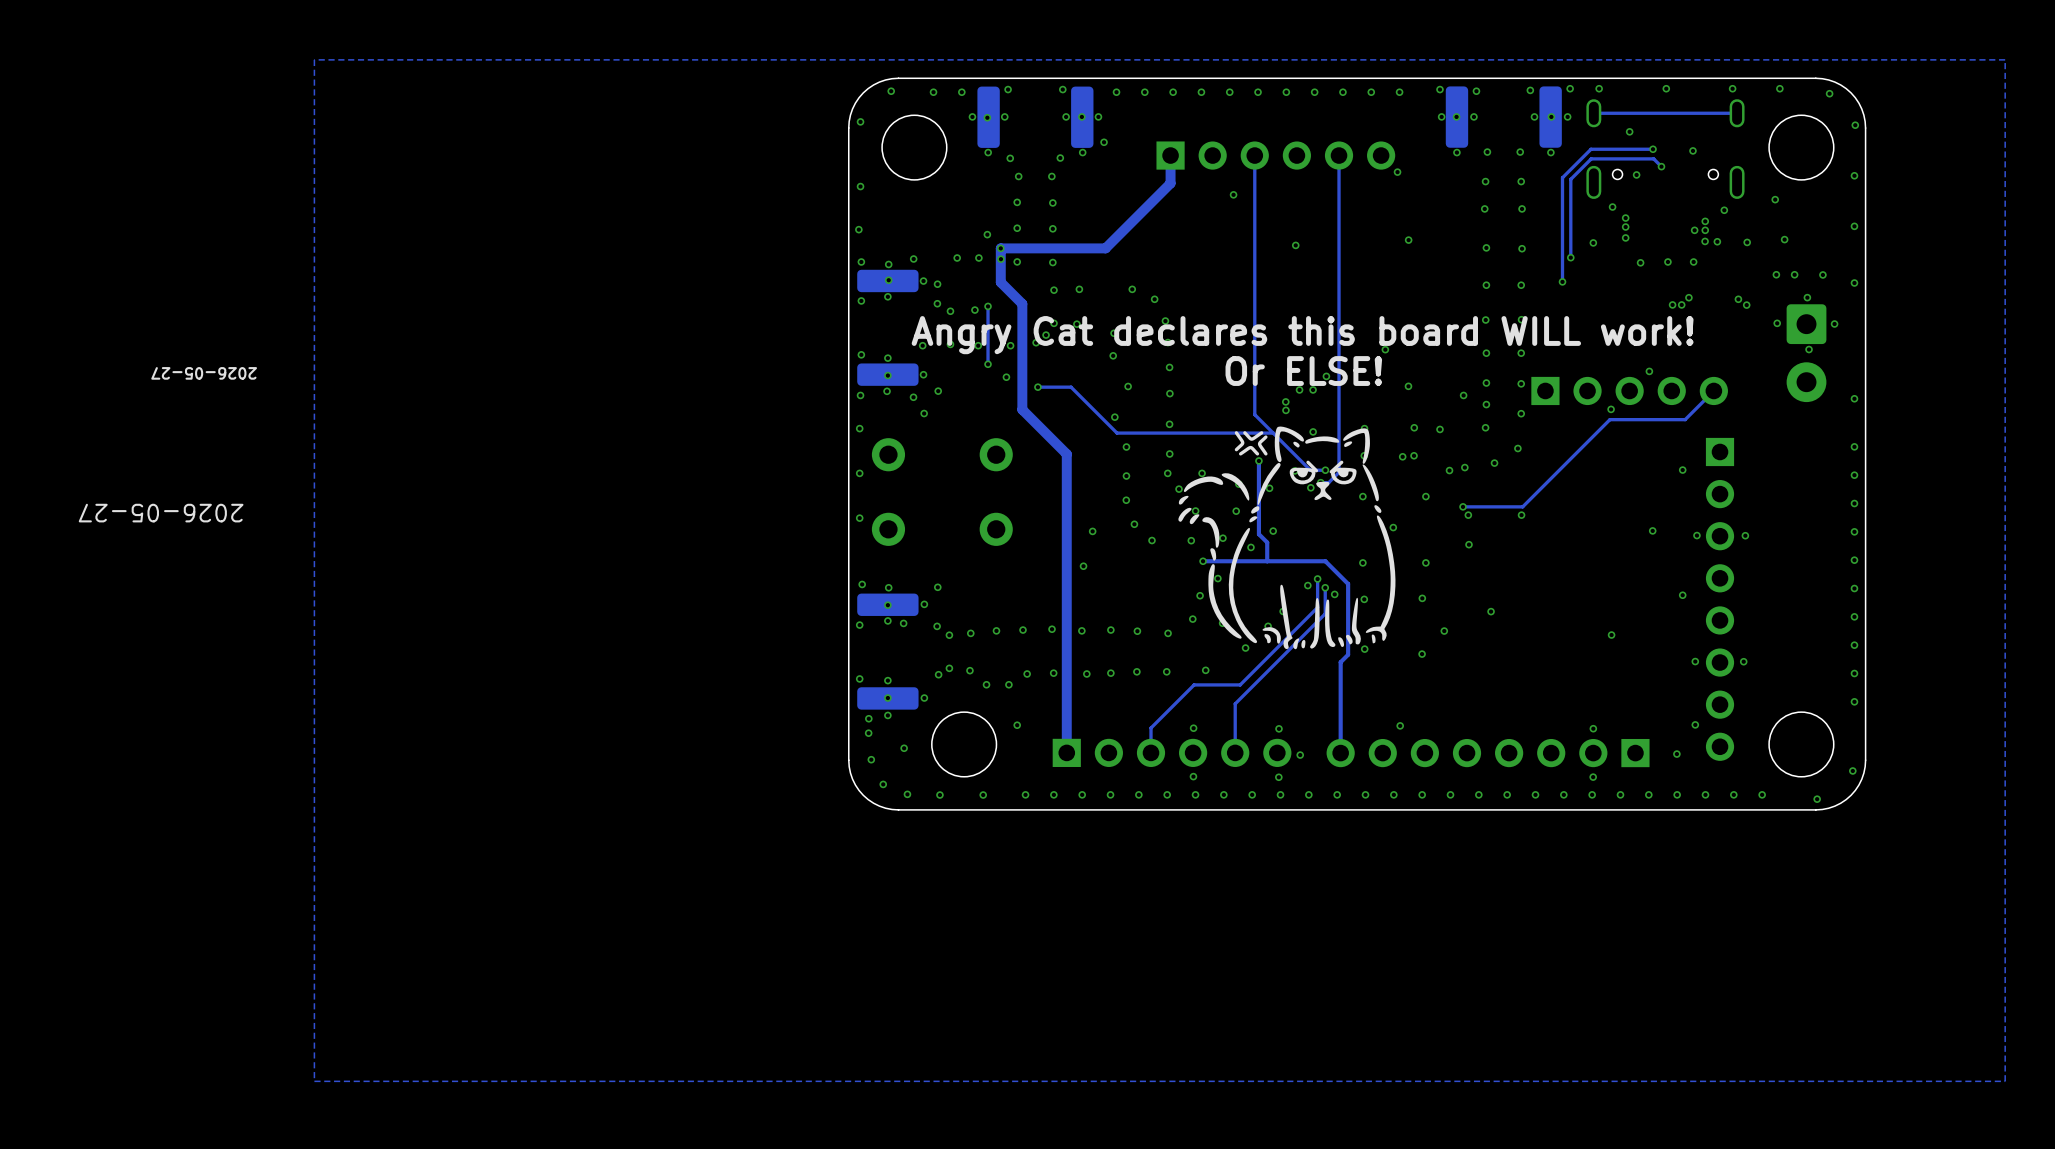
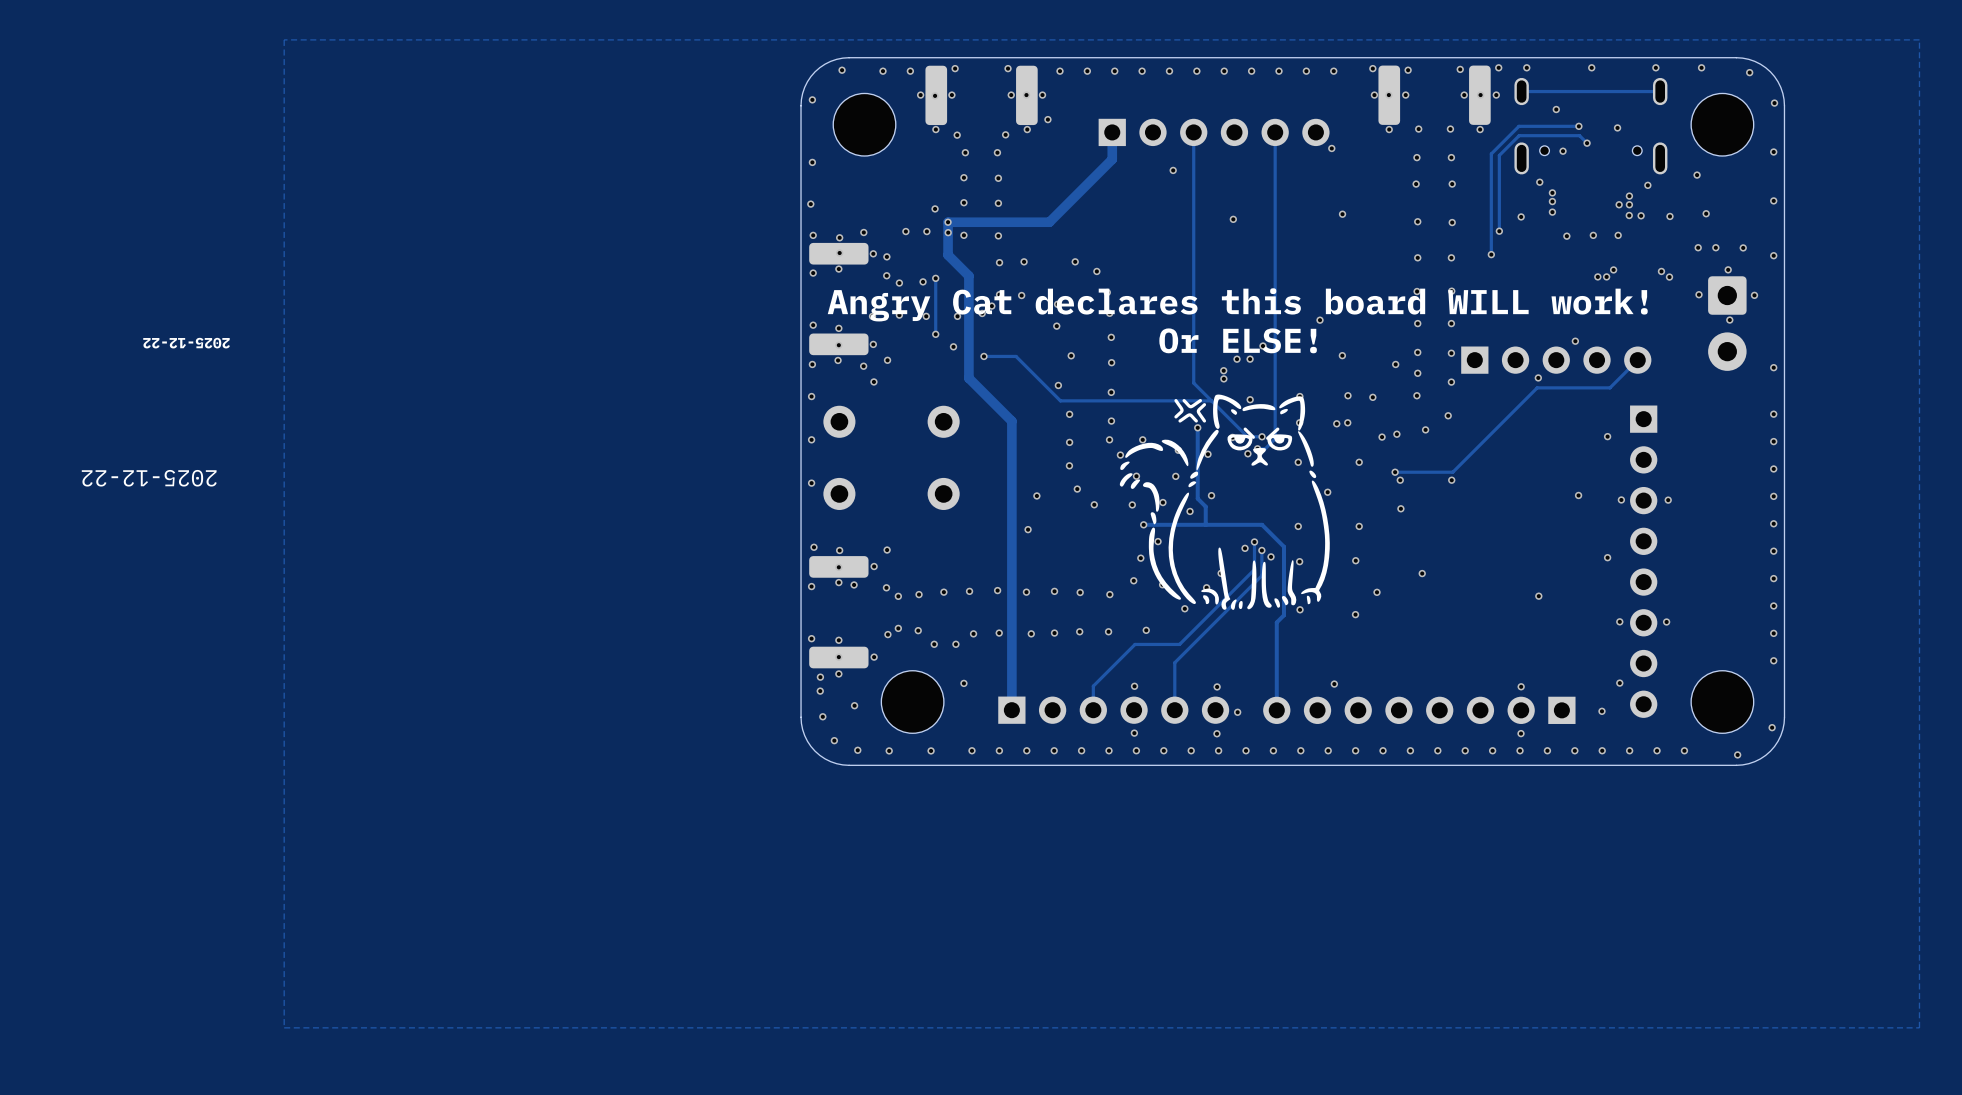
text: 2026-05-27 (204, 373) -> 2025-12-22 (186, 343)
text: 2026-05-27 (161, 513) -> 2025-12-22 (149, 478)

